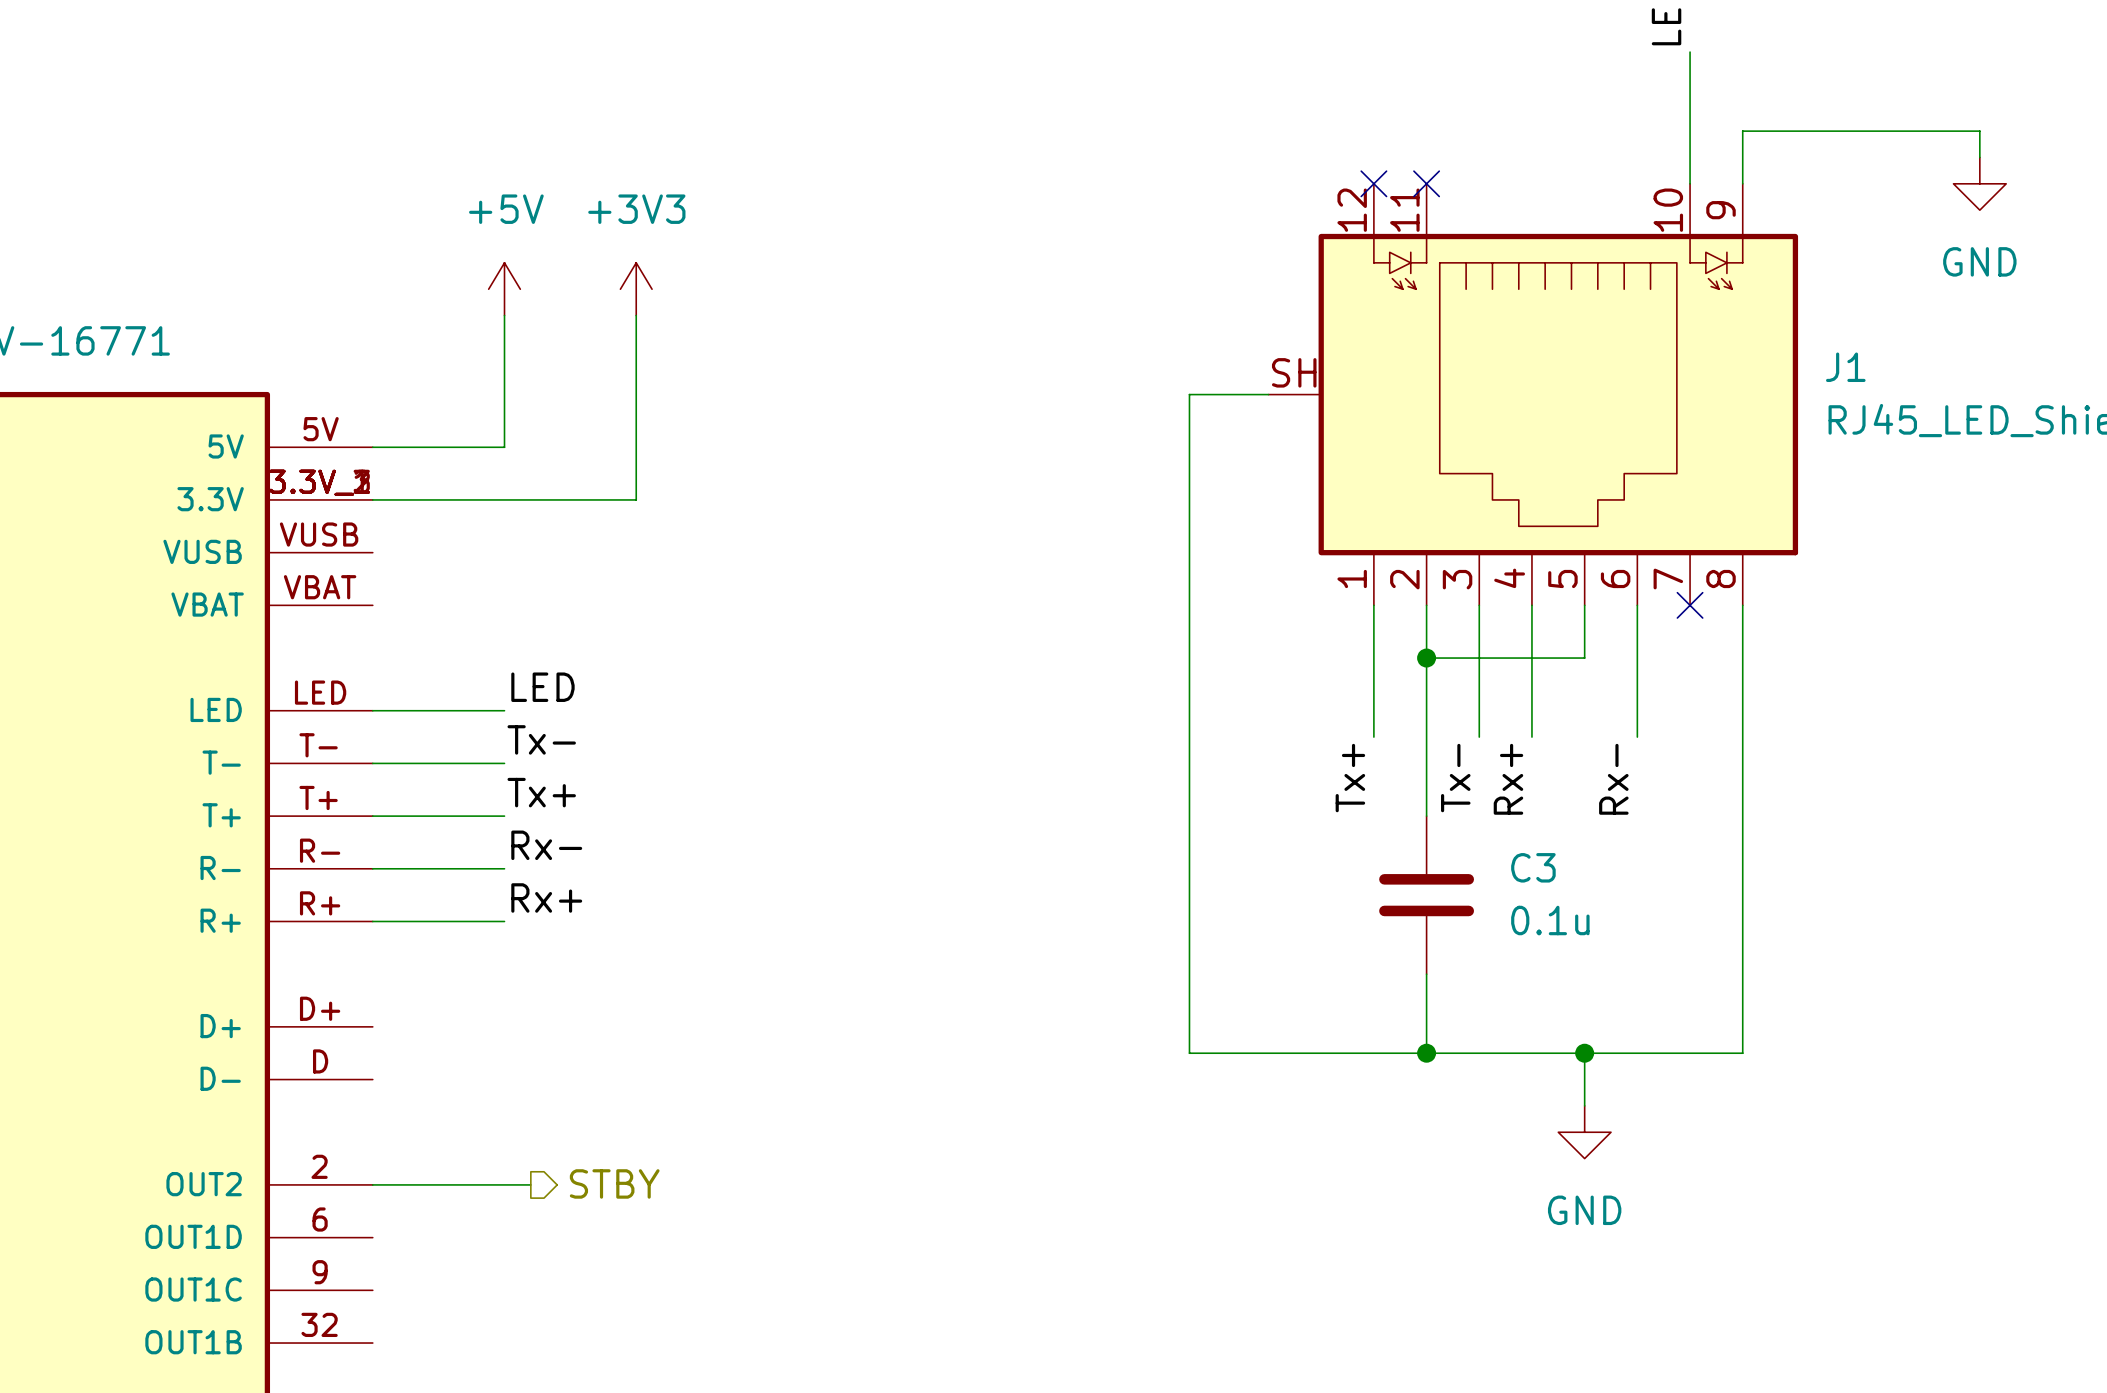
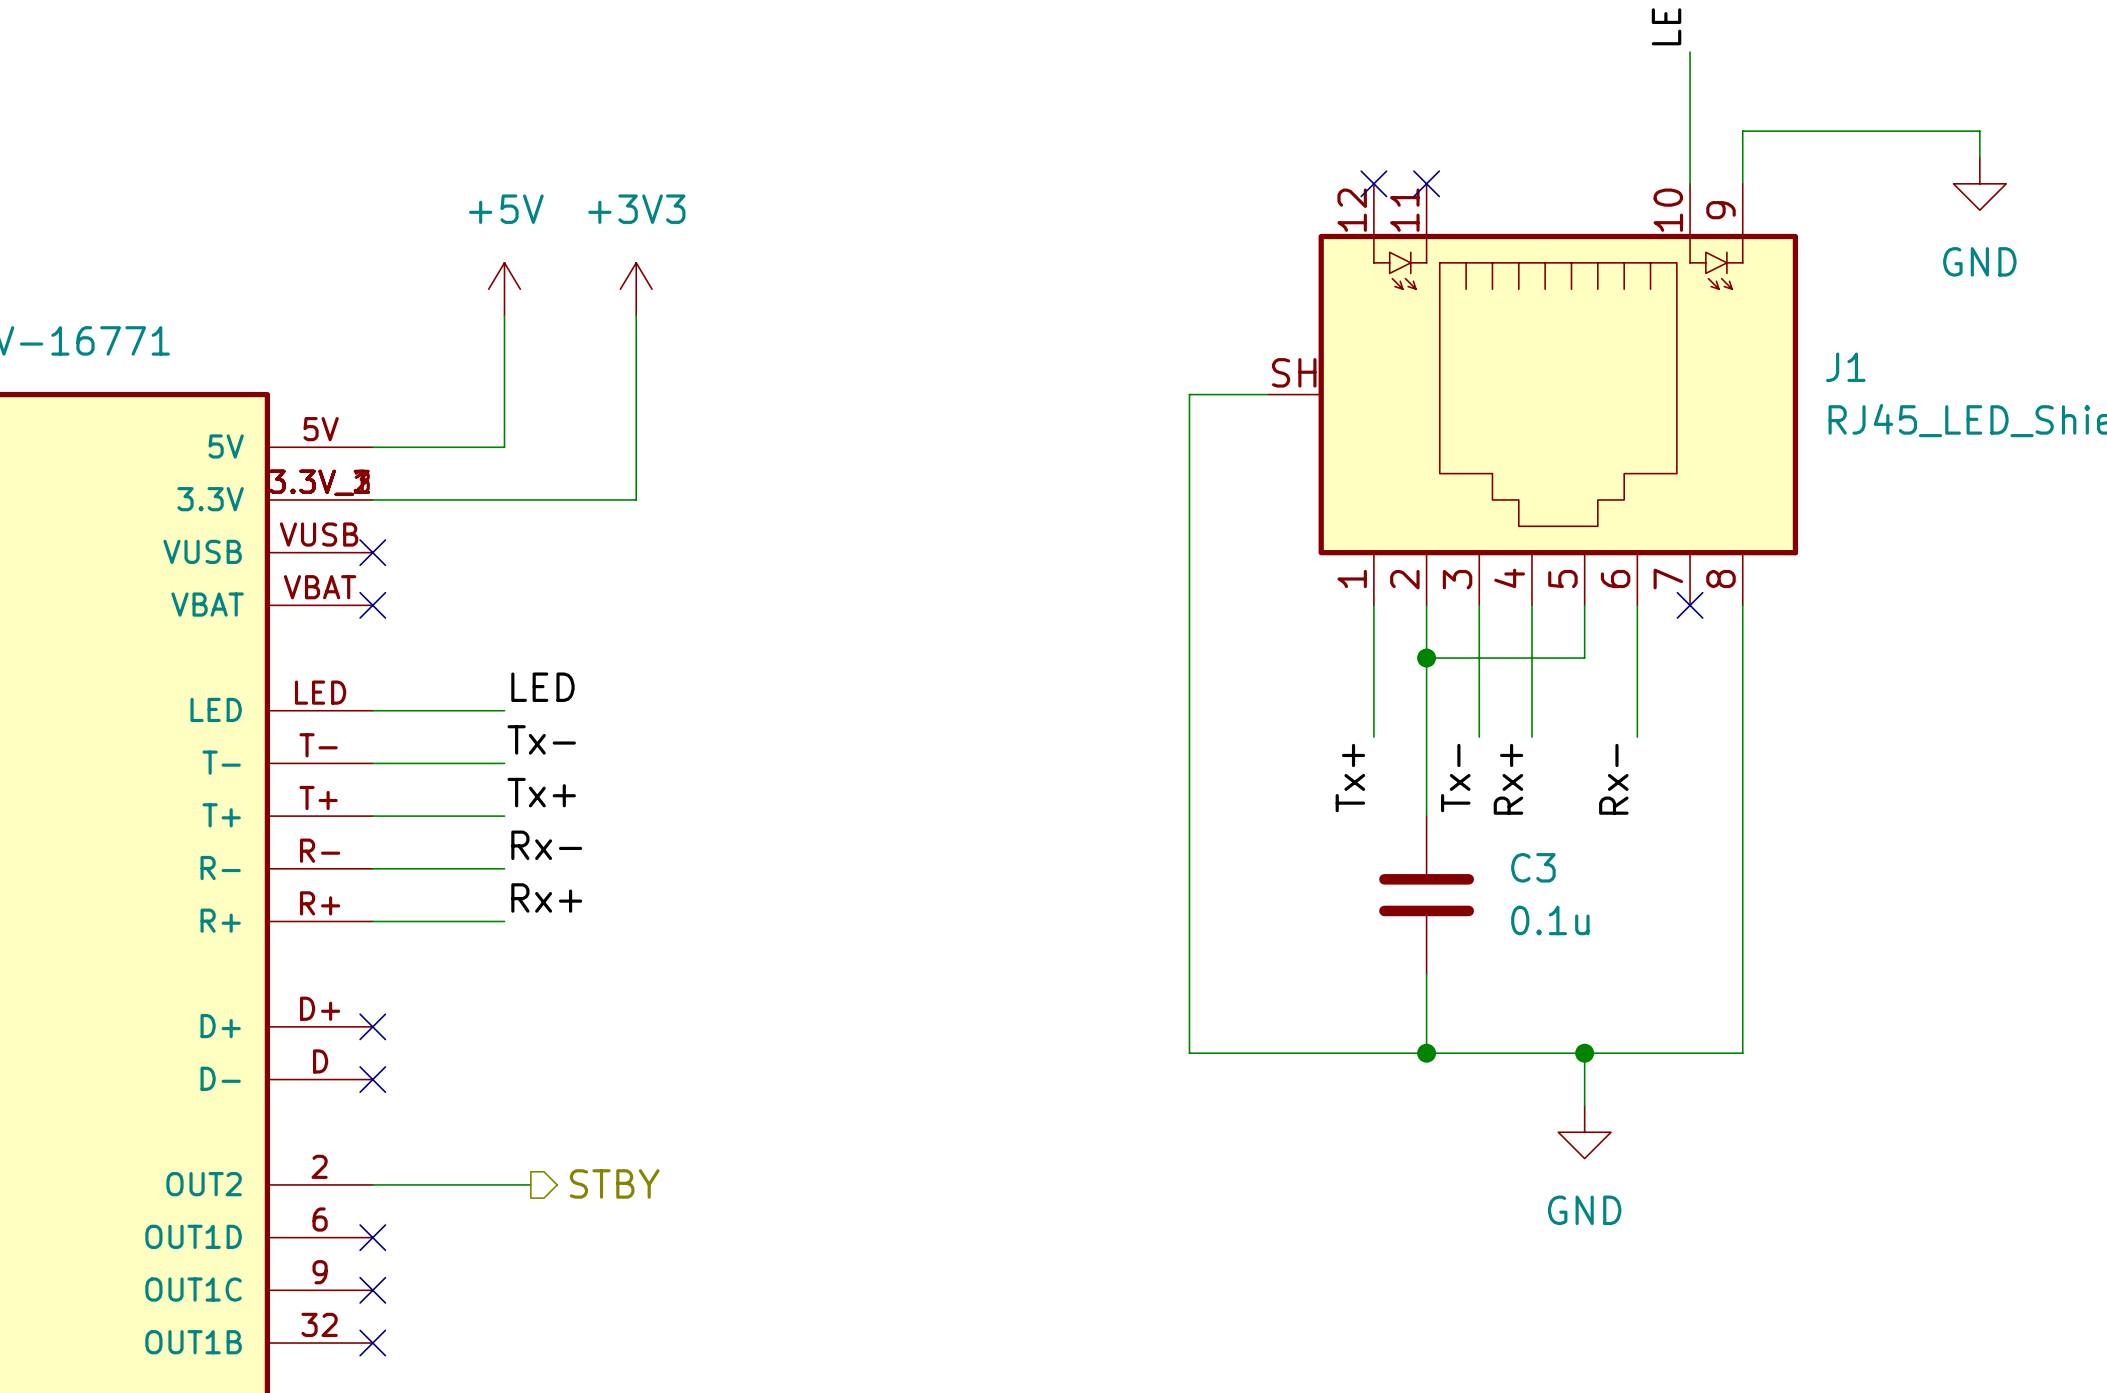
no-connect mark: none -> (372, 552)
no-connect mark: none -> (372, 605)
no-connect mark: none -> (372, 1026)
no-connect mark: none -> (372, 1079)
no-connect mark: none -> (372, 1237)
no-connect mark: none -> (372, 1290)
no-connect mark: none -> (372, 1343)

